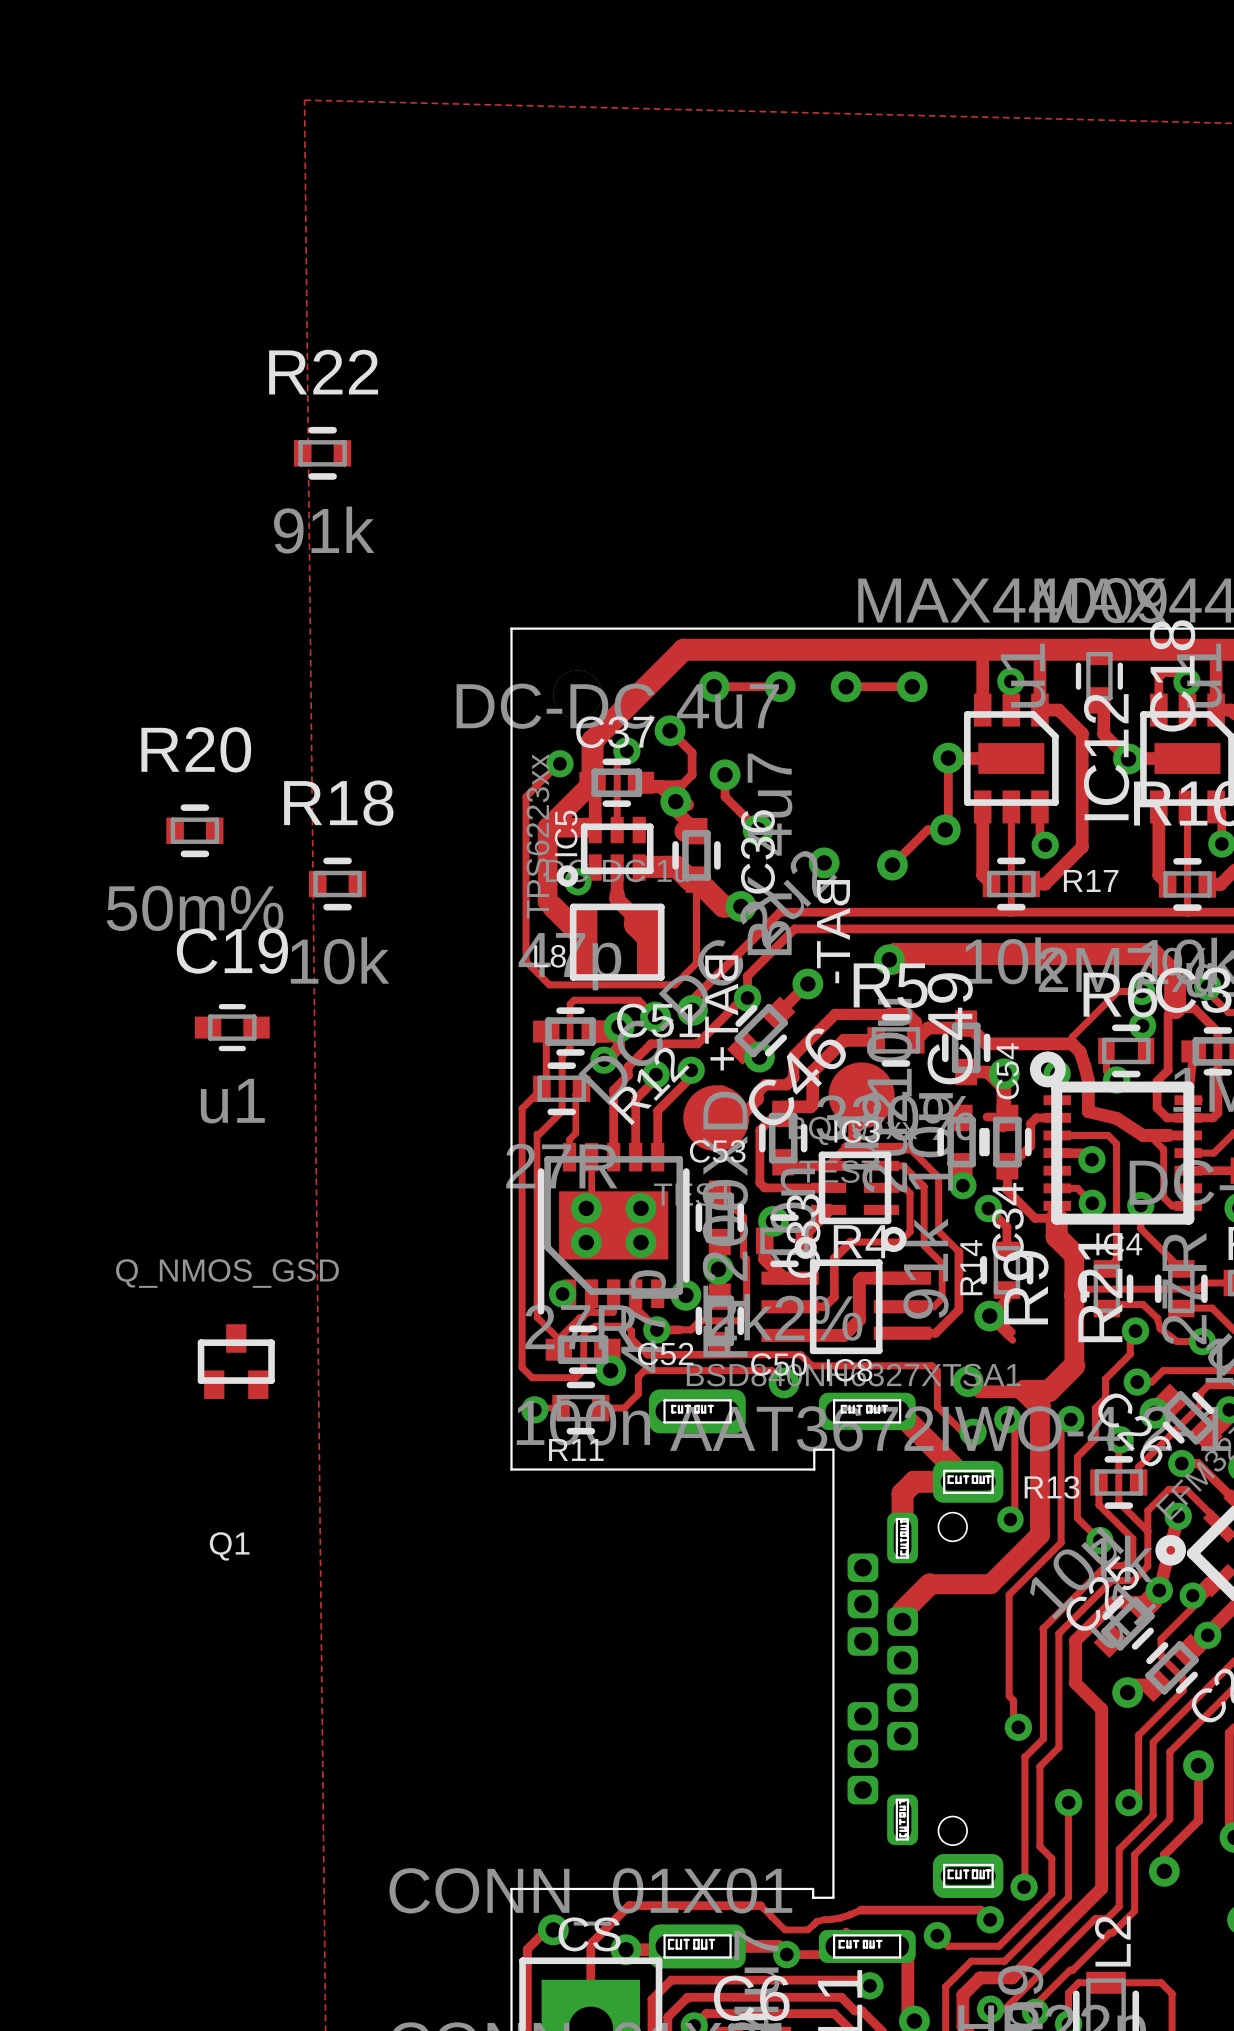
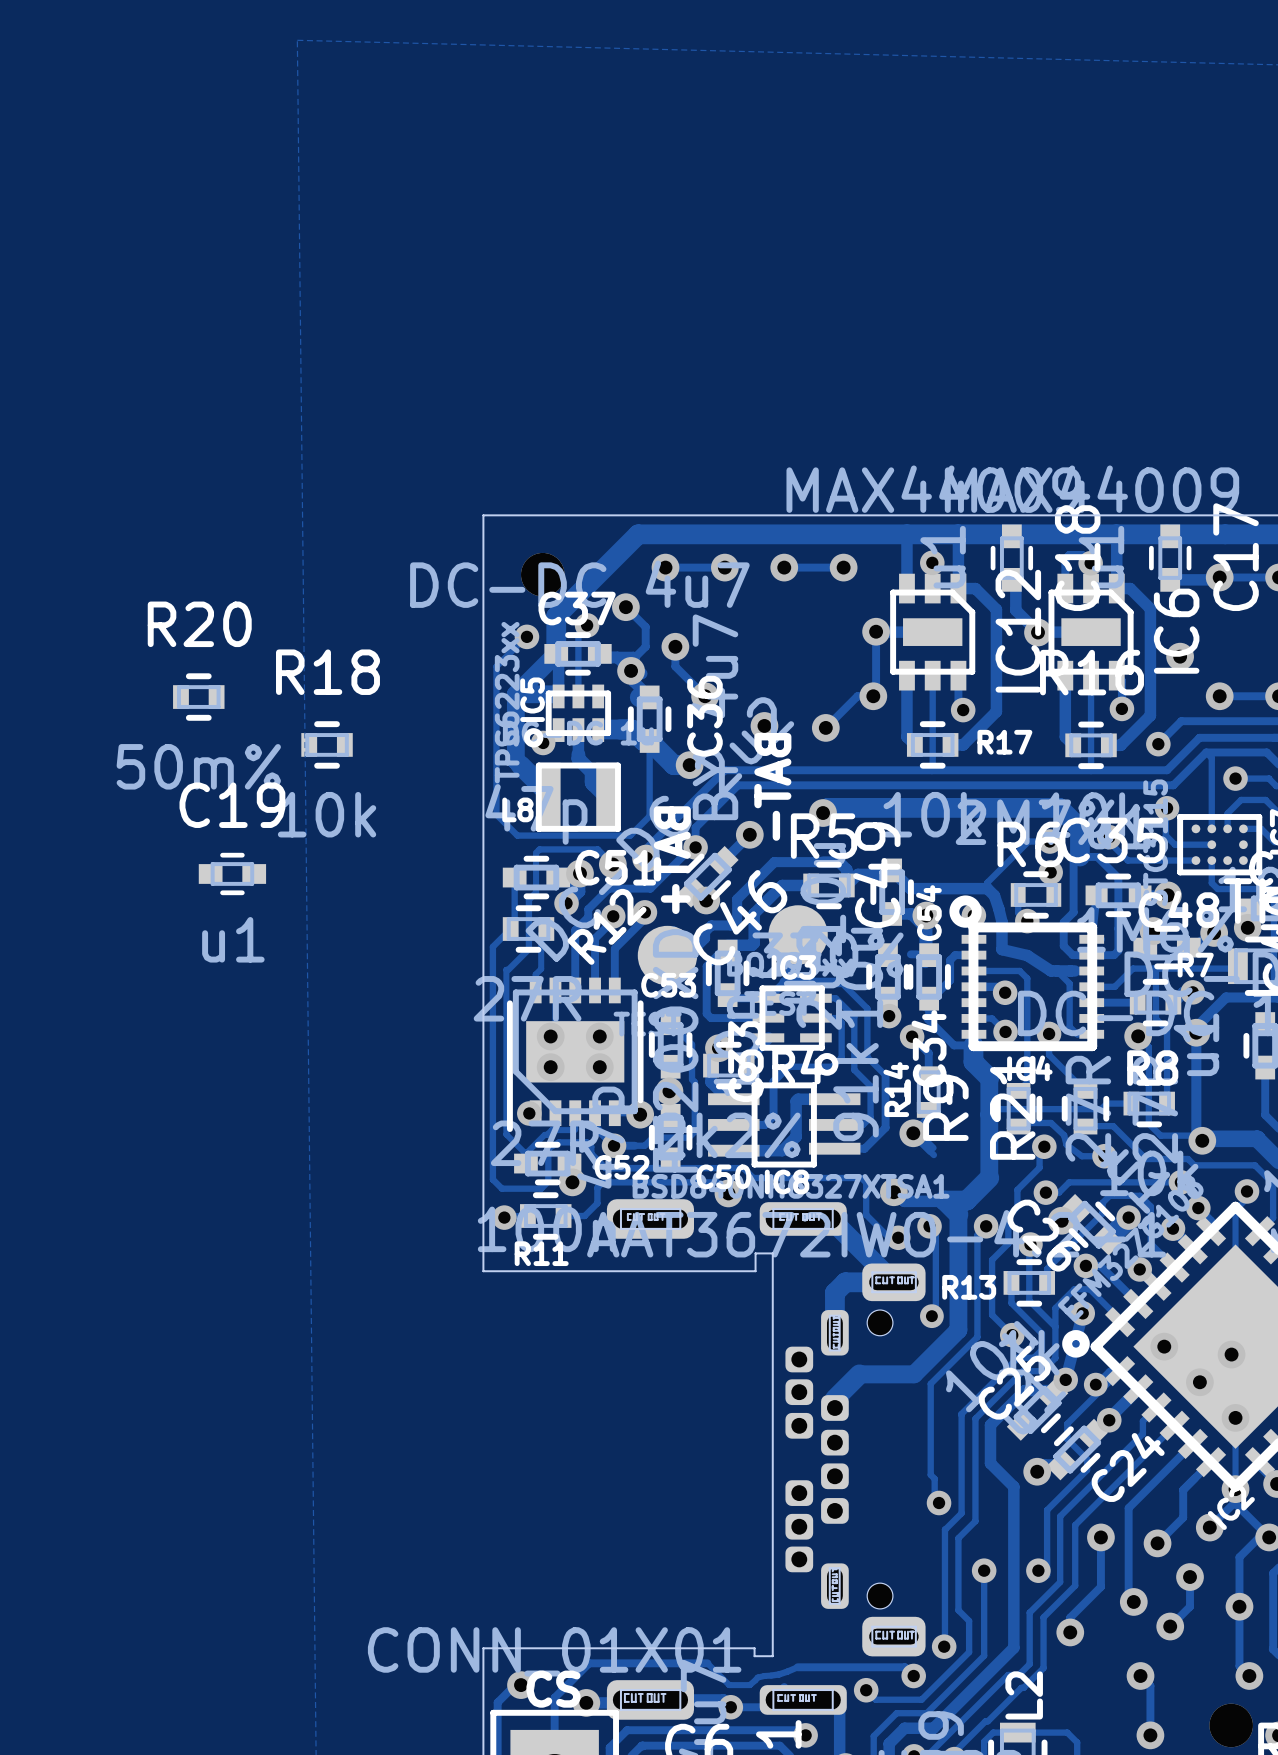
R22: 91k (322, 453) -> none
Q1: Q_NMOS_GSD (236, 1361) -> none

